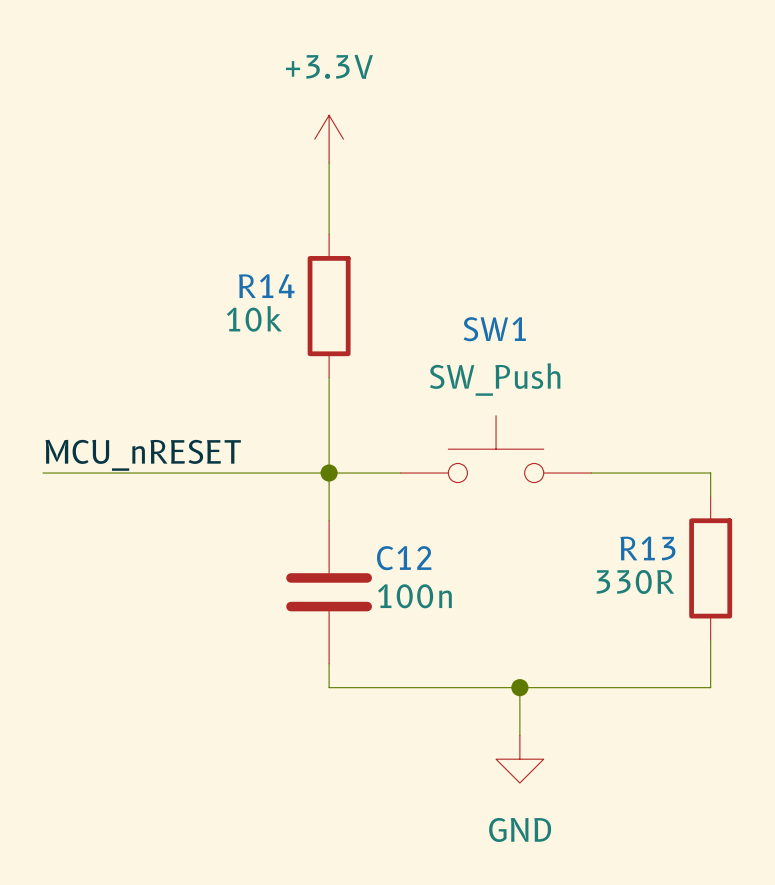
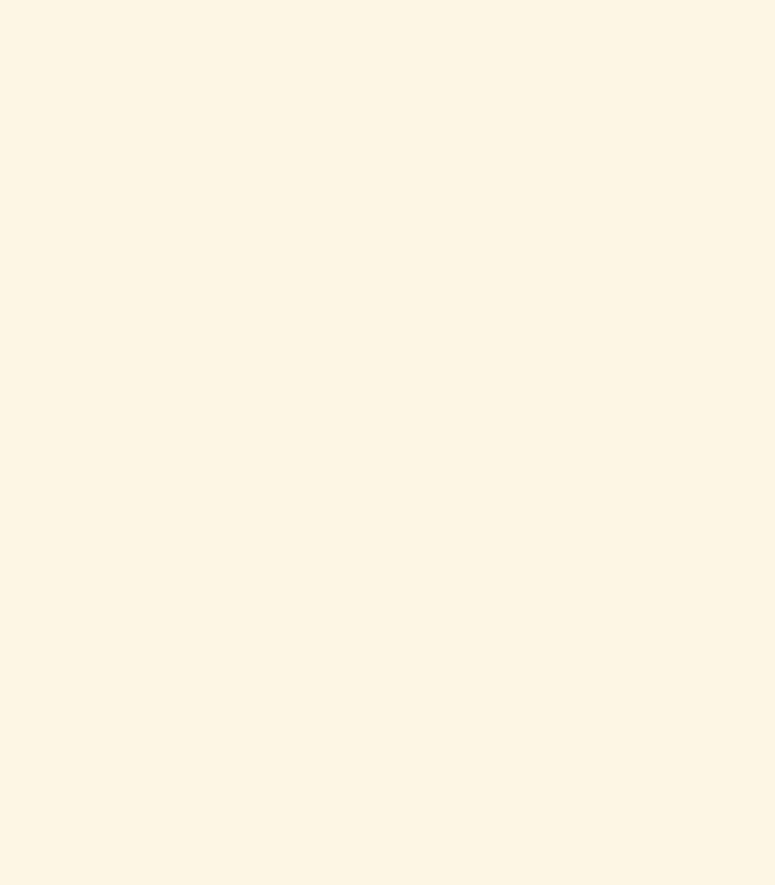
power symbol: +3.3V (329, 139) -> none
wire: (329, 163) (329, 234) -> none
R14: 10k (329, 306) -> none
wire: (329, 377) (329, 520) -> none
SW1: SW_Push (496, 449) -> none
label: MCU_nRESET (143, 455) -> none
wire: (42, 473) (400, 473) -> none
junction: (329, 473) -> none
wire: (591, 473) (710, 473) (710, 496) -> none
R13: 330R (710, 568) -> none
C12: 100n (329, 592) -> none
wire: (710, 639) (710, 687) (329, 687) (329, 663) -> none
wire: (519, 687) (519, 735) -> none
junction: (519, 687) -> none
power symbol: GND (519, 759) -> none

